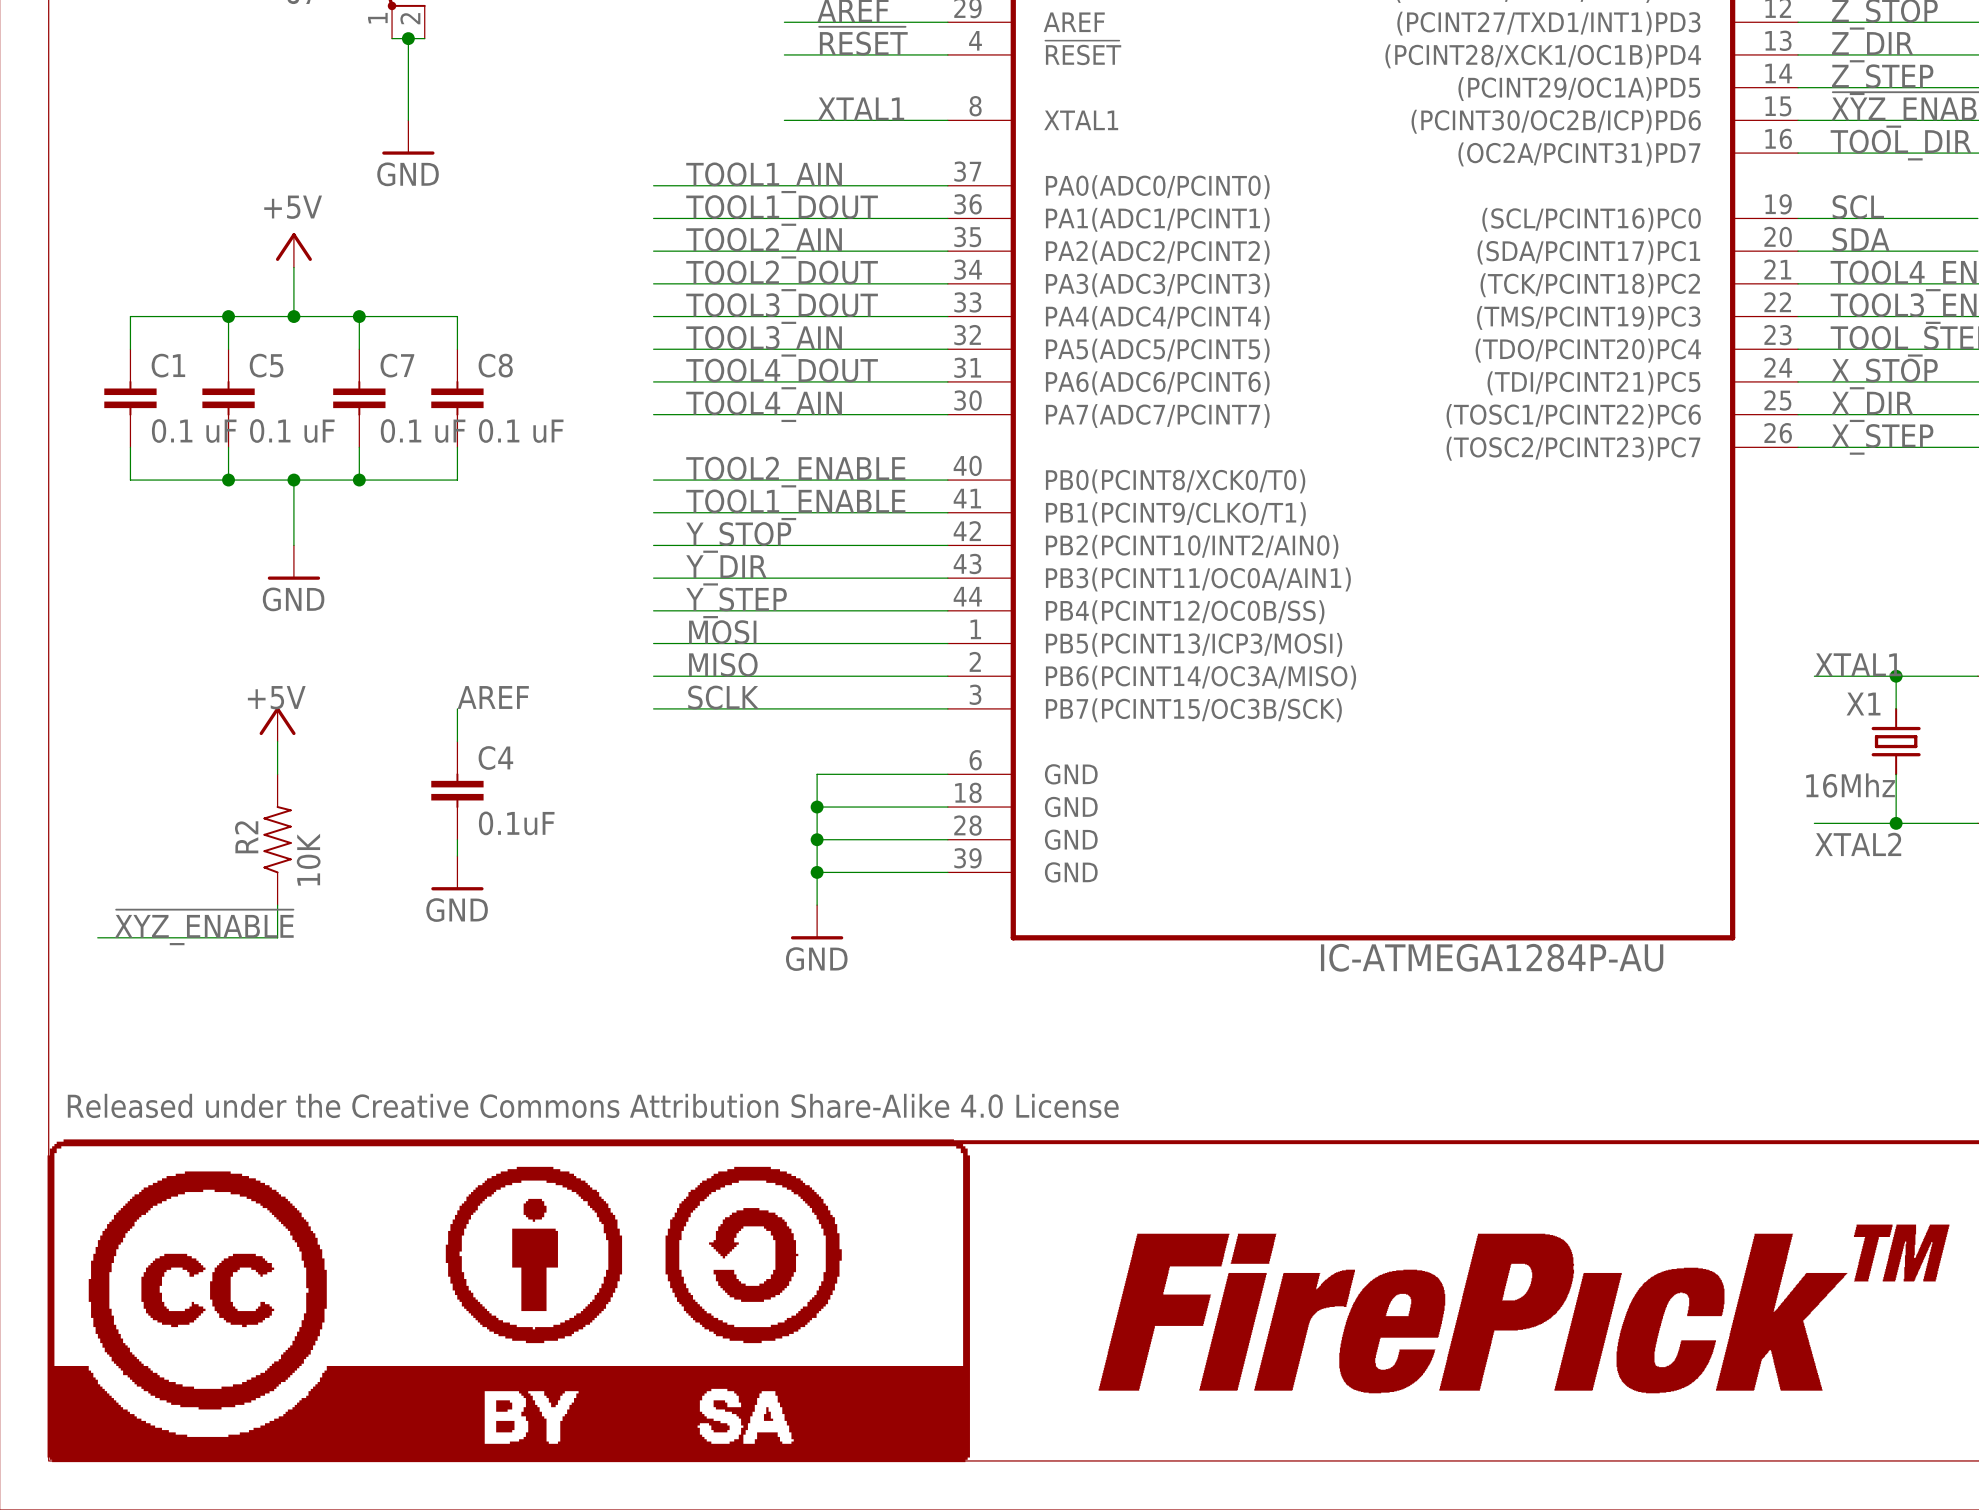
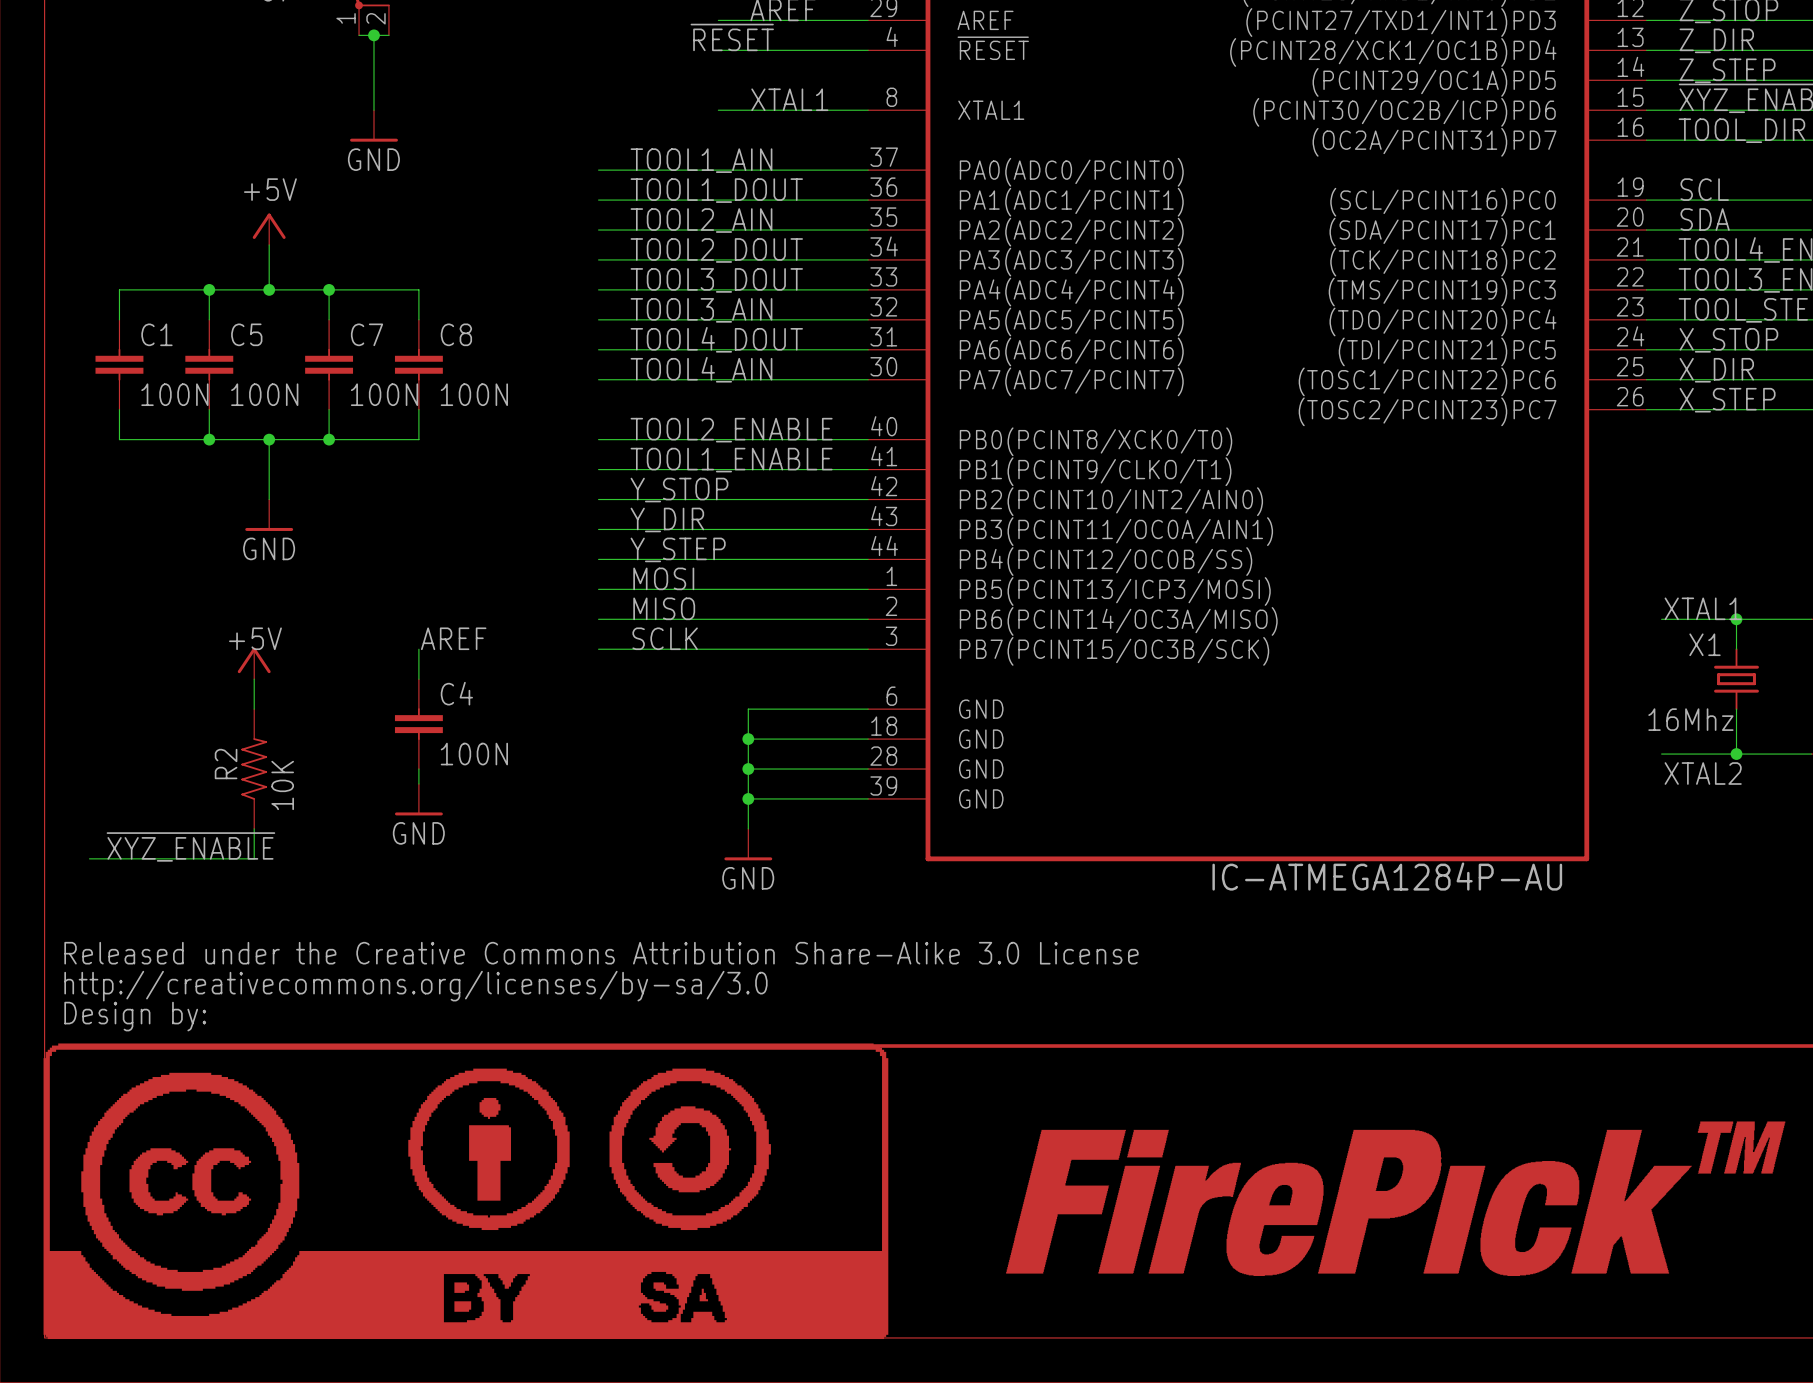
label position: ~{RESET} (863, 41) -> ~{RESET} (732, 37)
C1 value: 0.1 uF (194, 431) -> 100N (174, 394)
C5 value: 0.1 uF (292, 431) -> 100N (264, 394)
C7 value: 0.1 uF (423, 431) -> 100N (384, 394)
C8 value: 0.1 uF (521, 431) -> 100N (474, 394)
C4 value: 0.1uF (516, 823) -> 100N (474, 754)
part: none -> (601, 986)
text: Released under the Creative Commons Attribution Share-Alike 4.0 License (593, 1105) -> none

